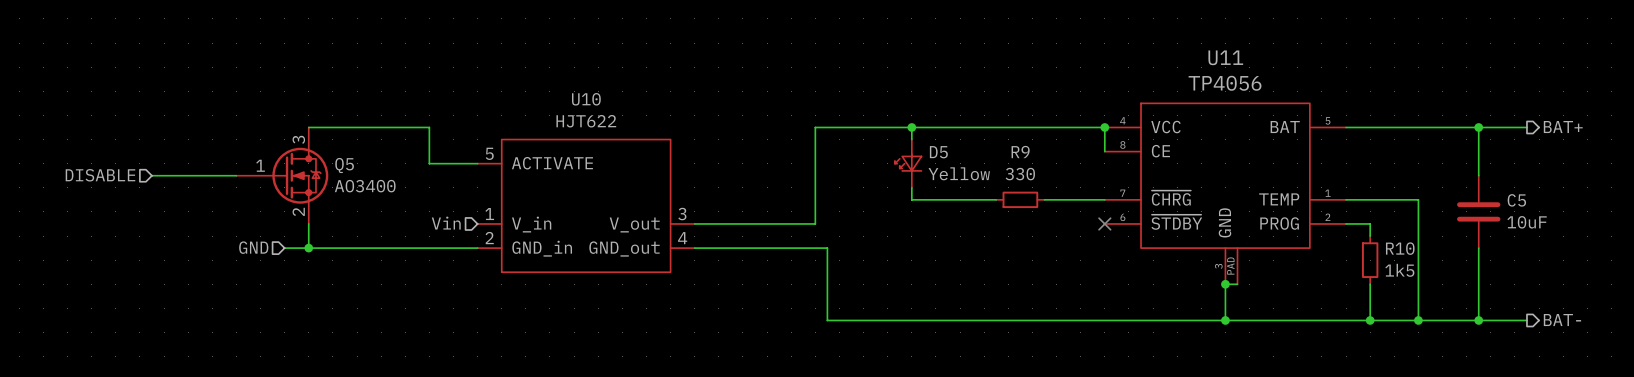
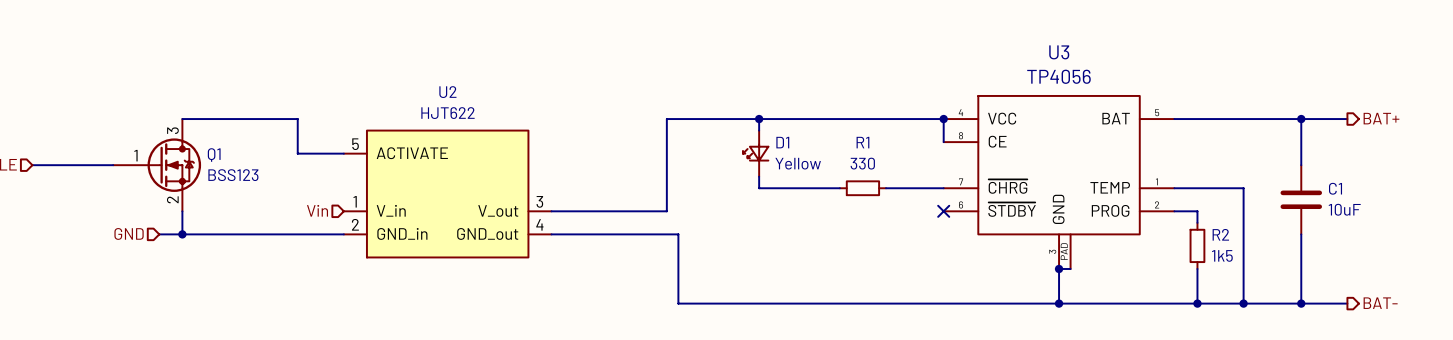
U11 name: U11 (1225, 57) -> U3 (1059, 52)
U10 name: U10 (586, 99) -> U2 (447, 92)
D5 name: D5 (938, 152) -> D1 (782, 142)
R9 name: R9 (1020, 152) -> R1 (862, 142)
Q5 name: Q5 (344, 165) -> Q1 (214, 155)
Q5 value: AO3400 (365, 186) -> BSS123 (233, 175)
C5 name: C5 (1516, 200) -> C1 (1335, 188)
R10 name: R10 (1400, 248) -> R2 (1220, 234)

